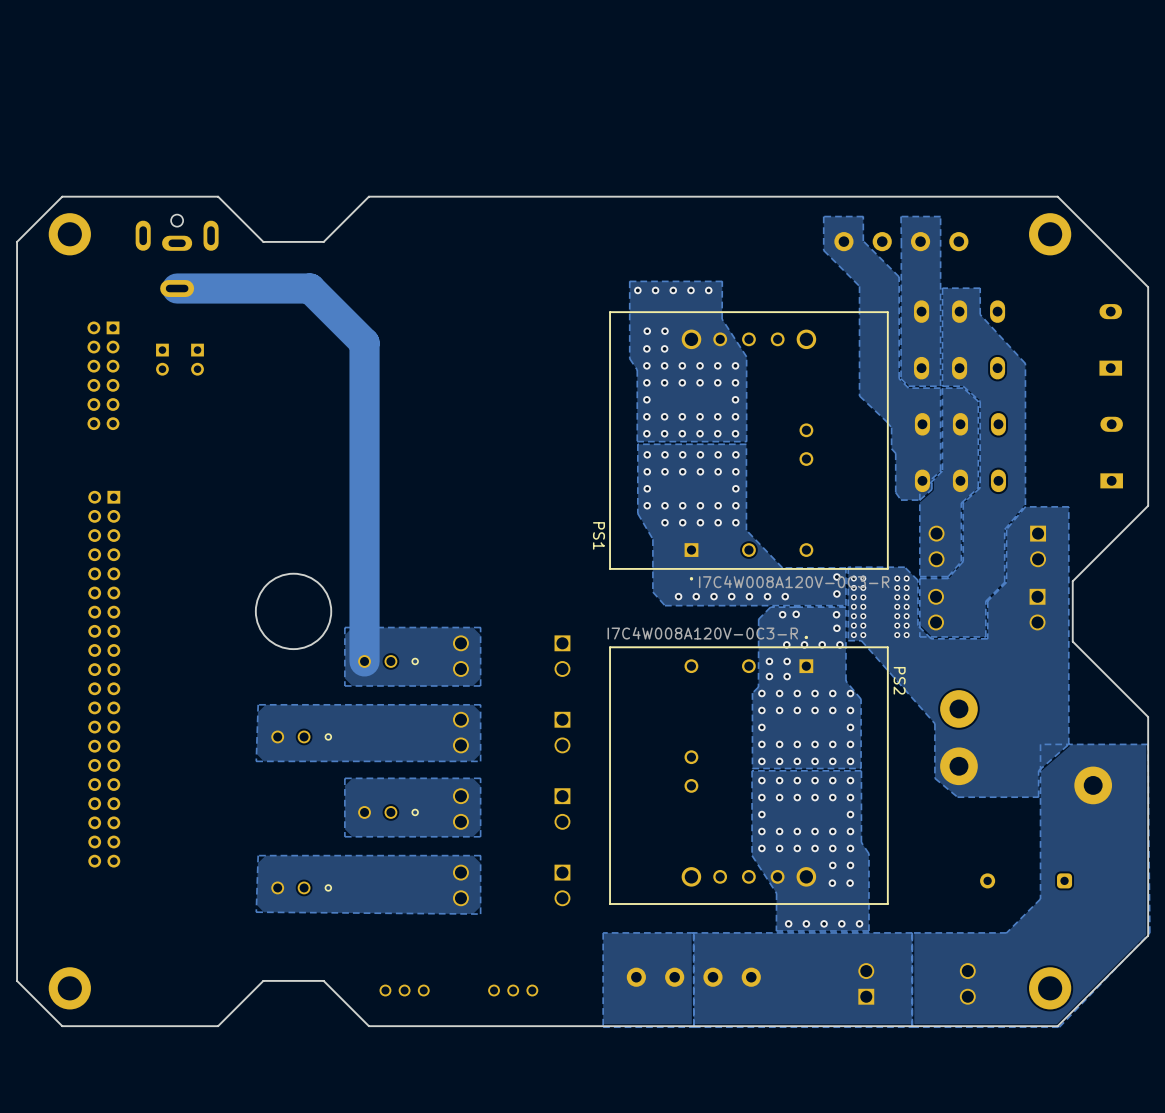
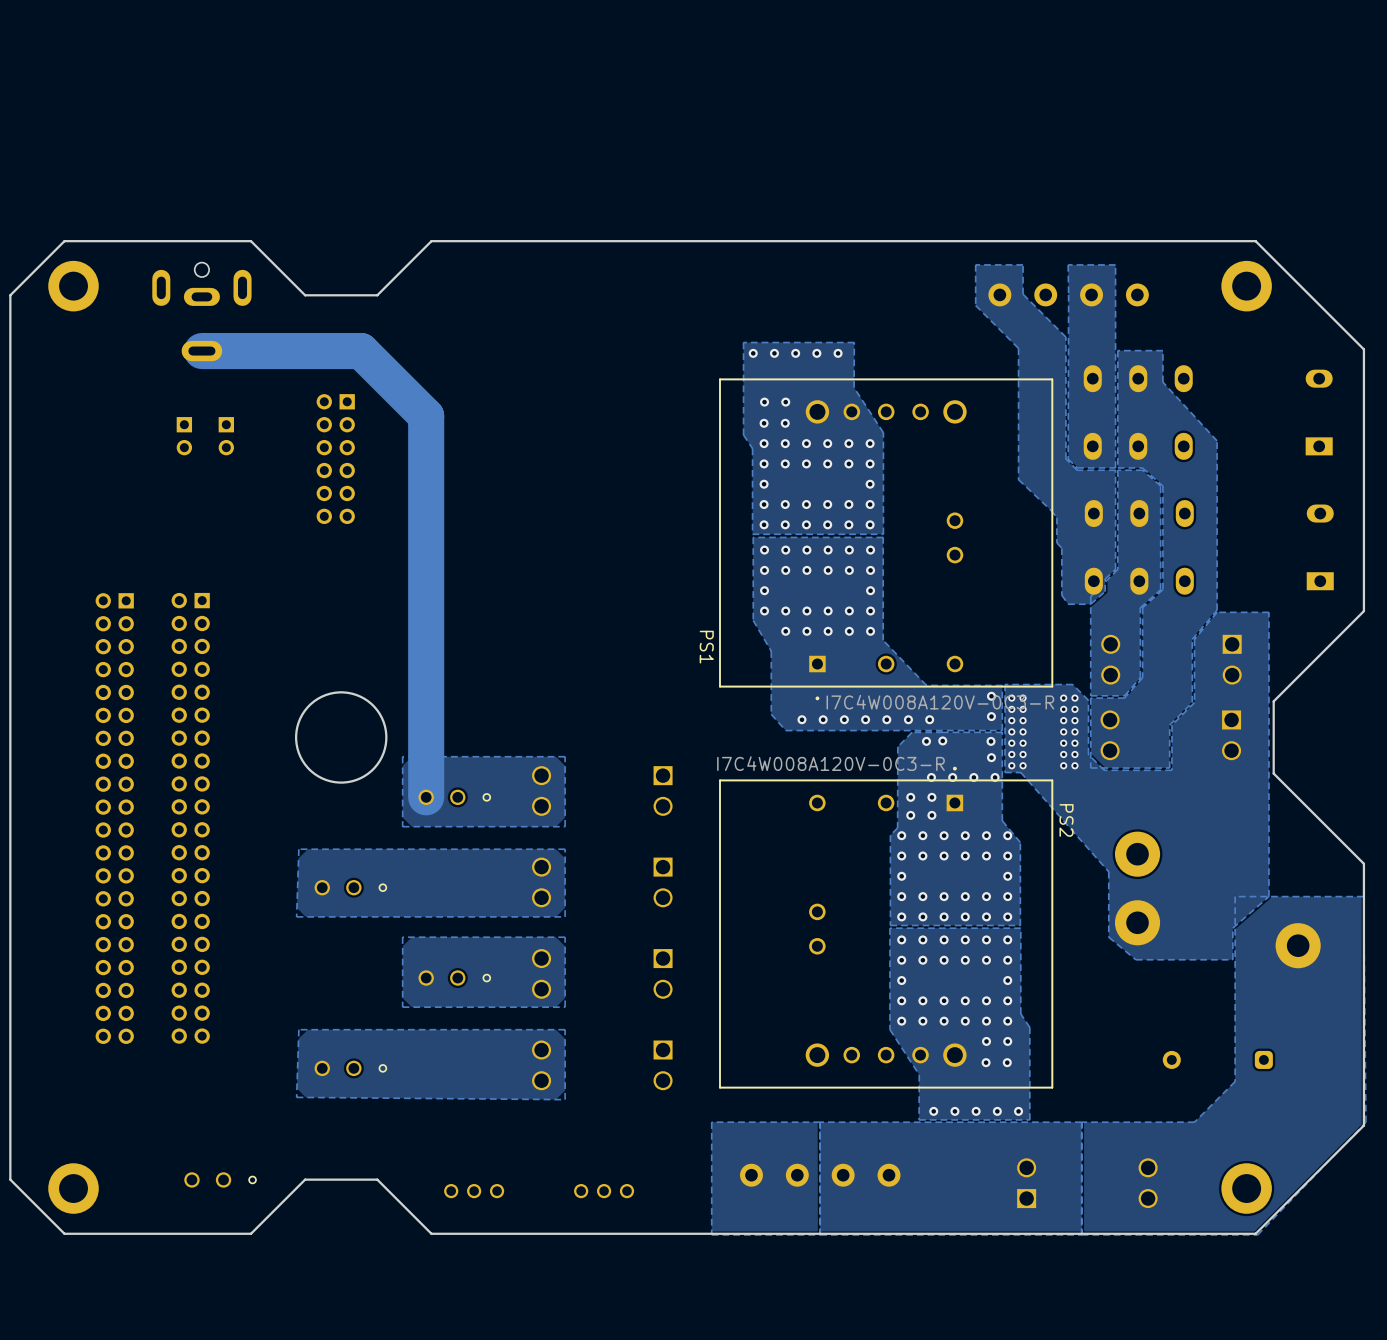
part position: (103, 375) -> (335, 459)
part: none -> (190, 818)
part: none -> (220, 1179)

